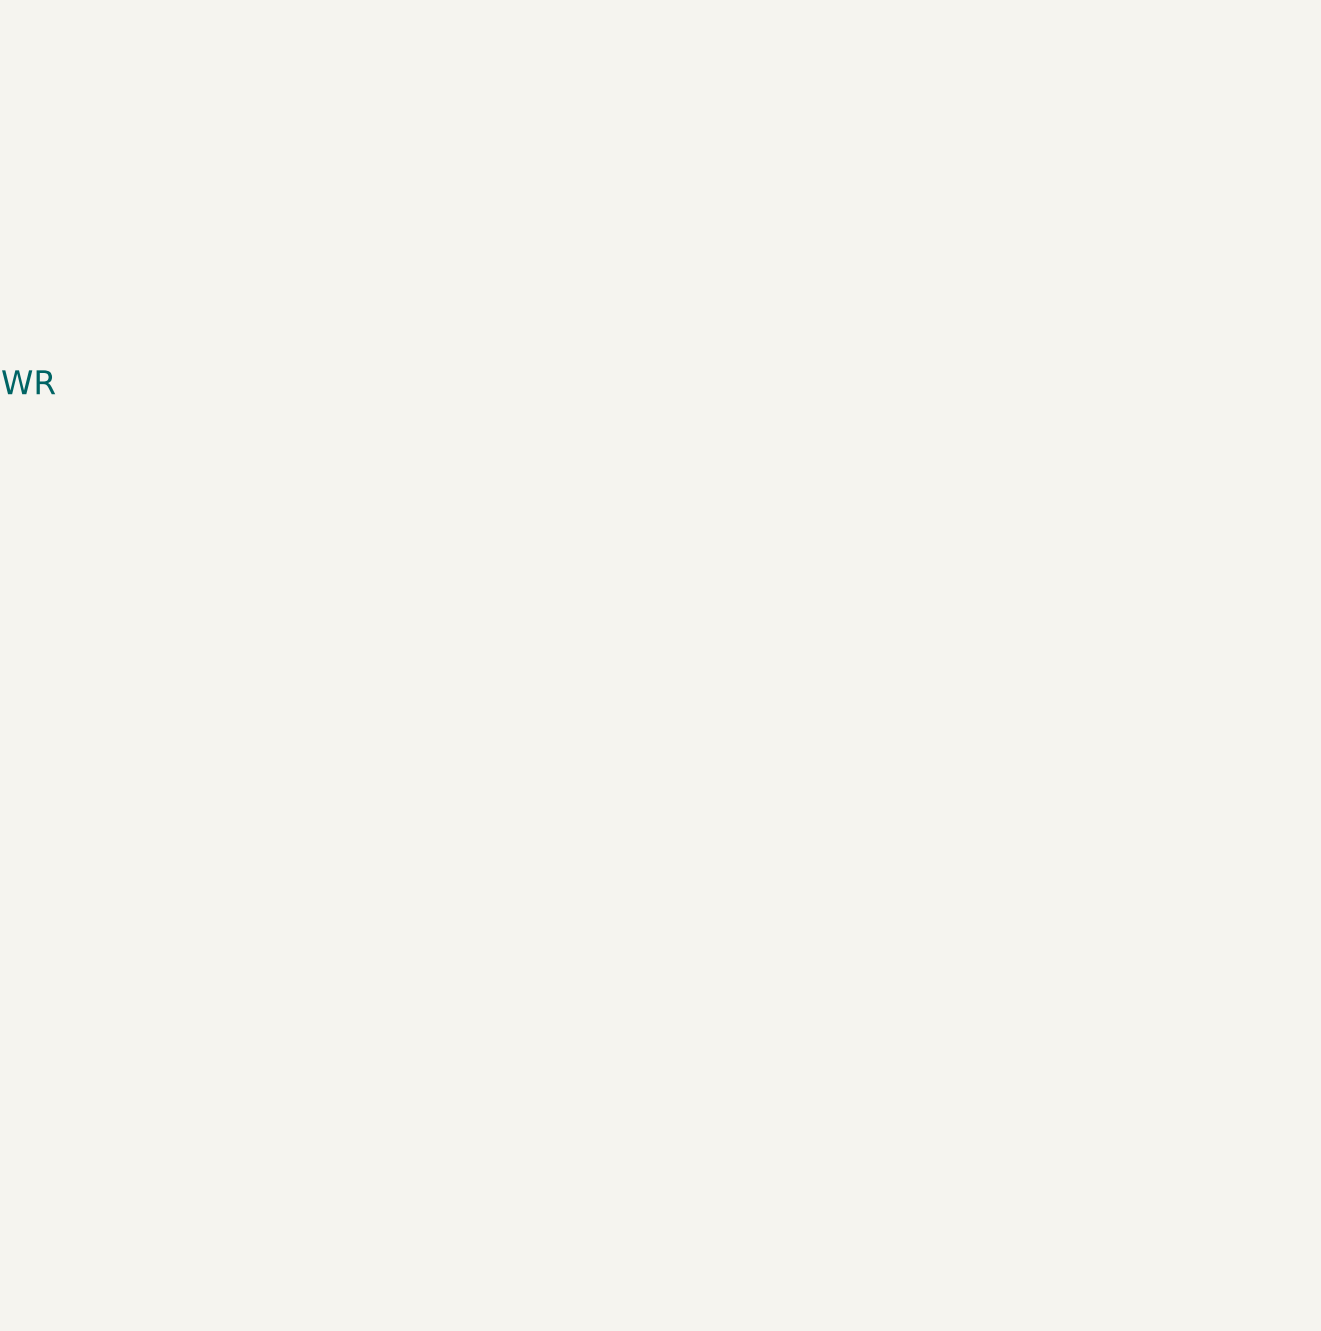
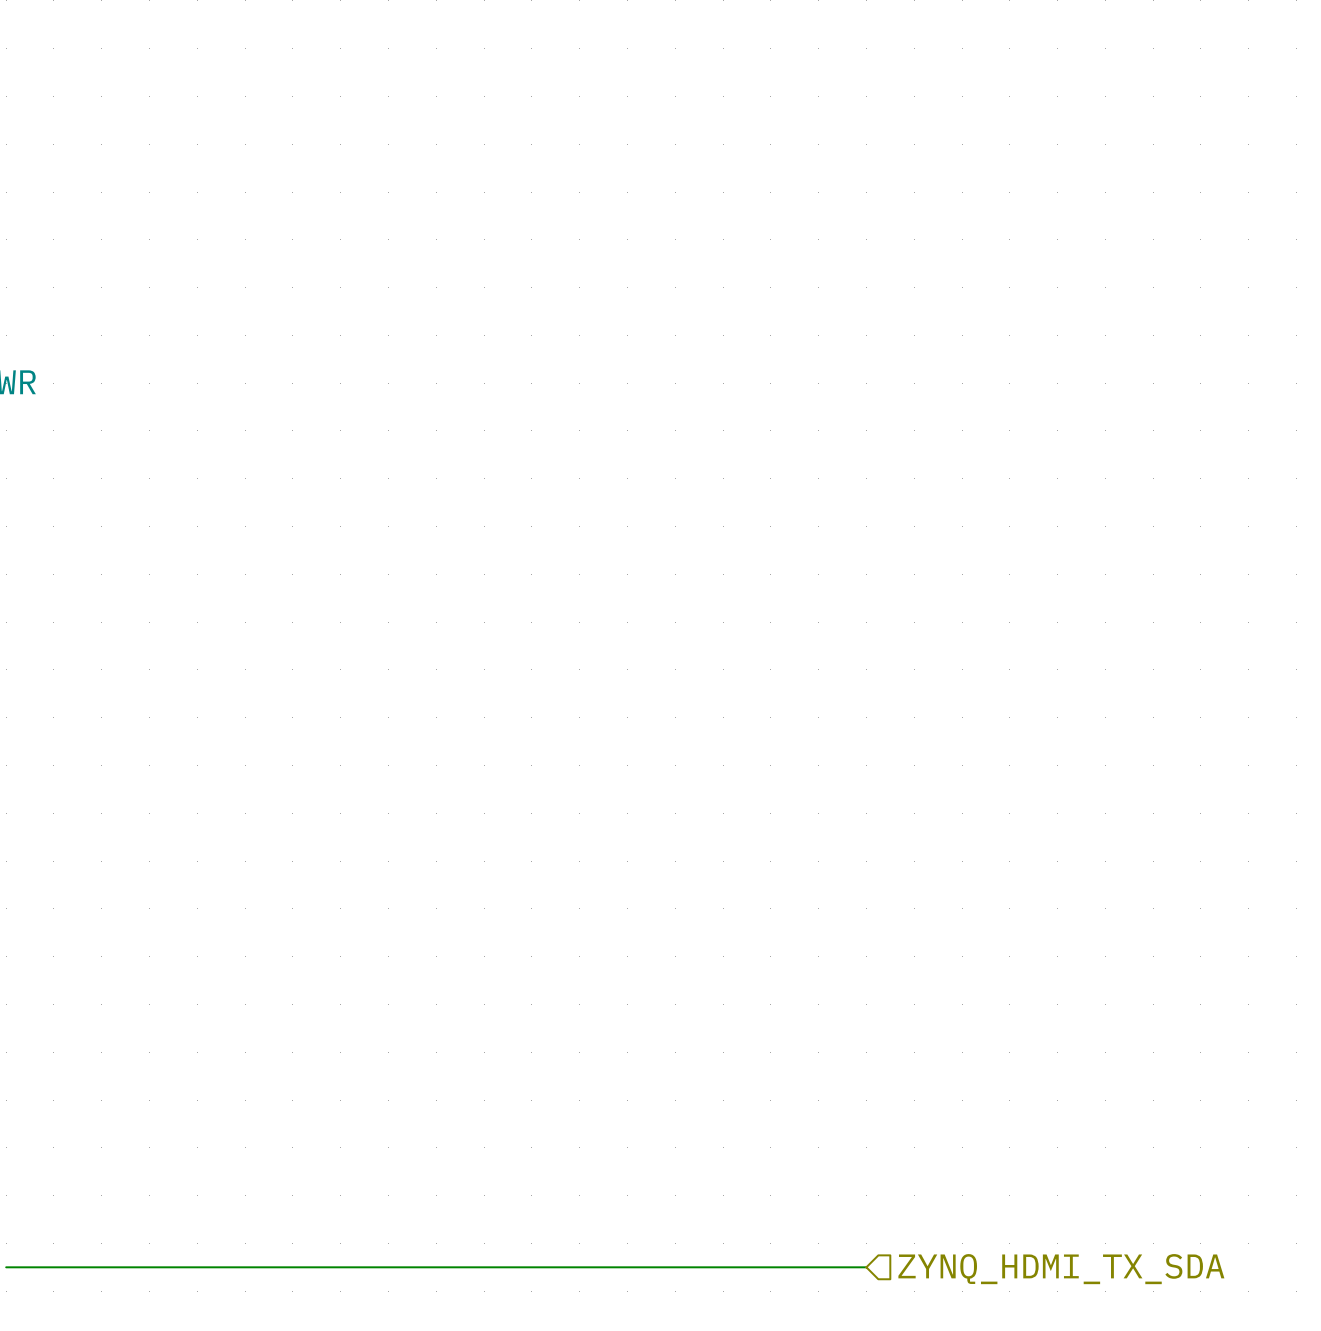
wire: none -> (6, 1267) (866, 1267)
hierarchical label: none -> ZYNQ_HDMI_TX_SDA (1061, 1269)

